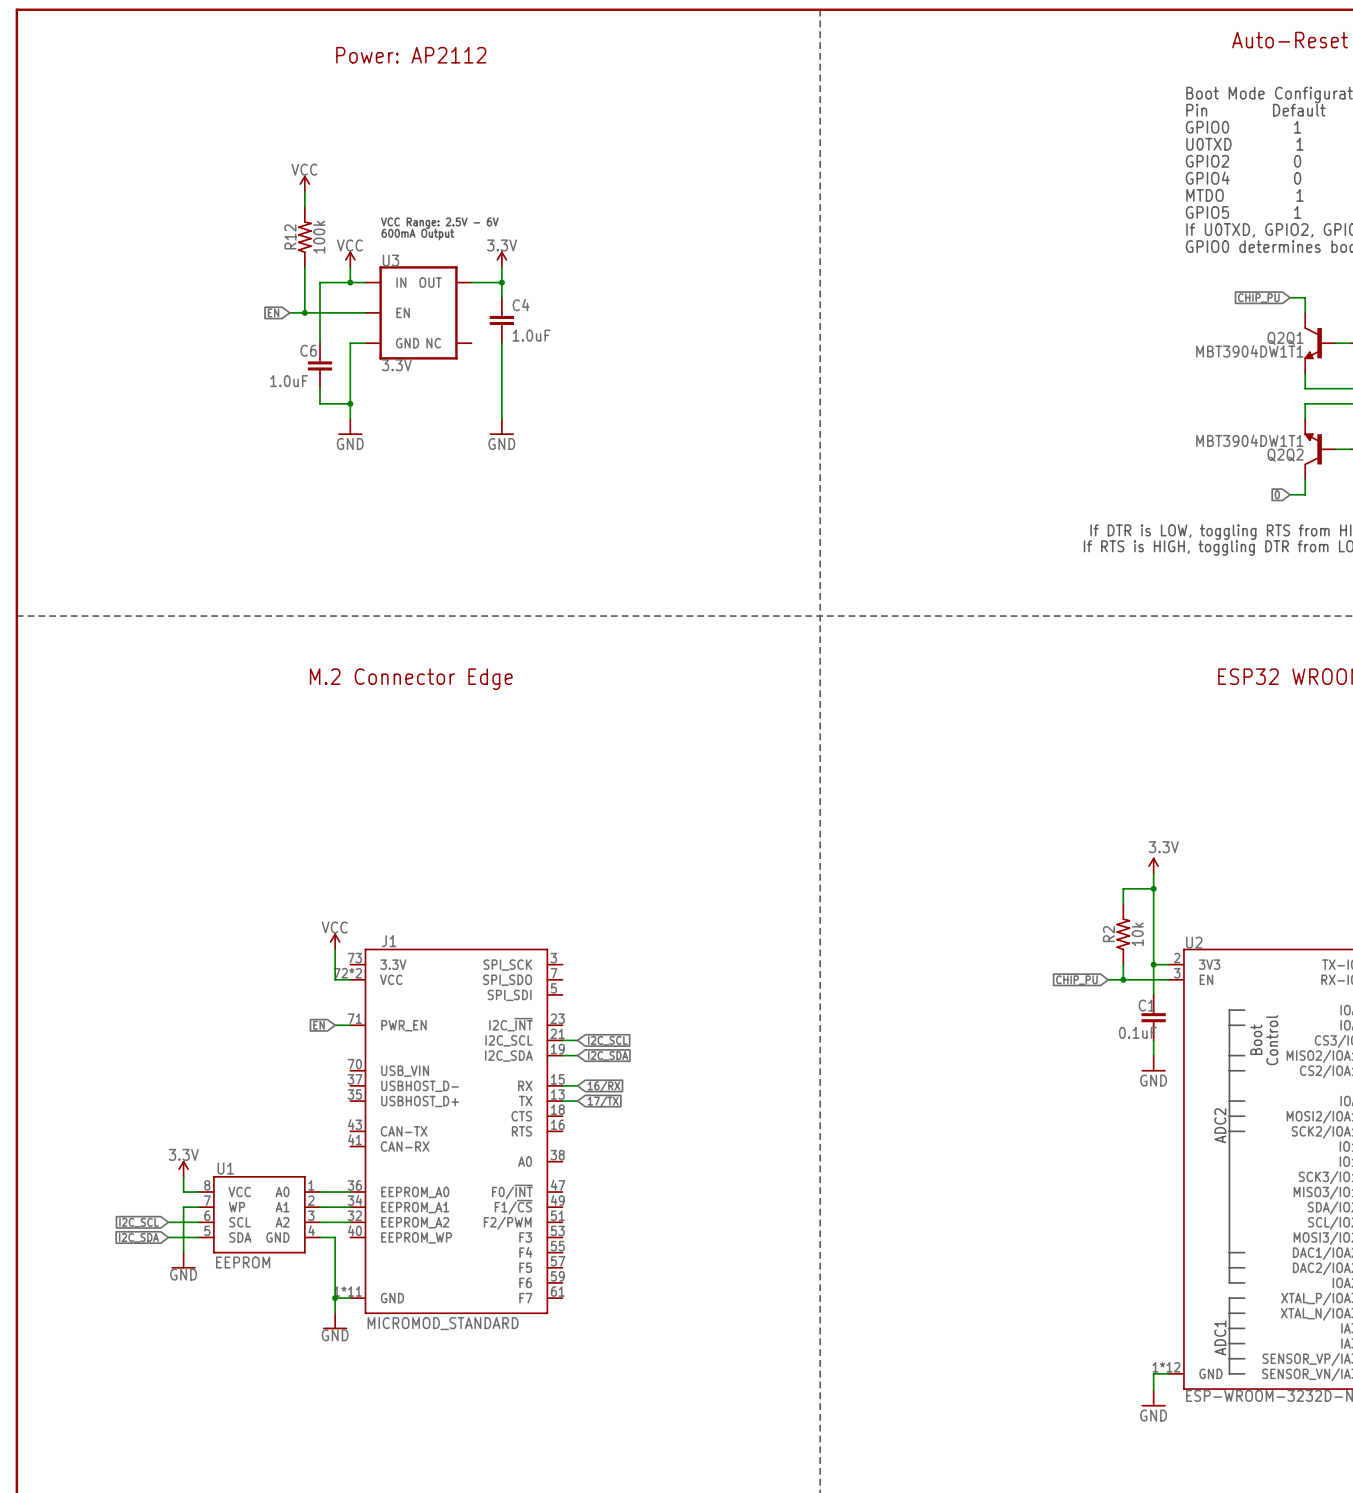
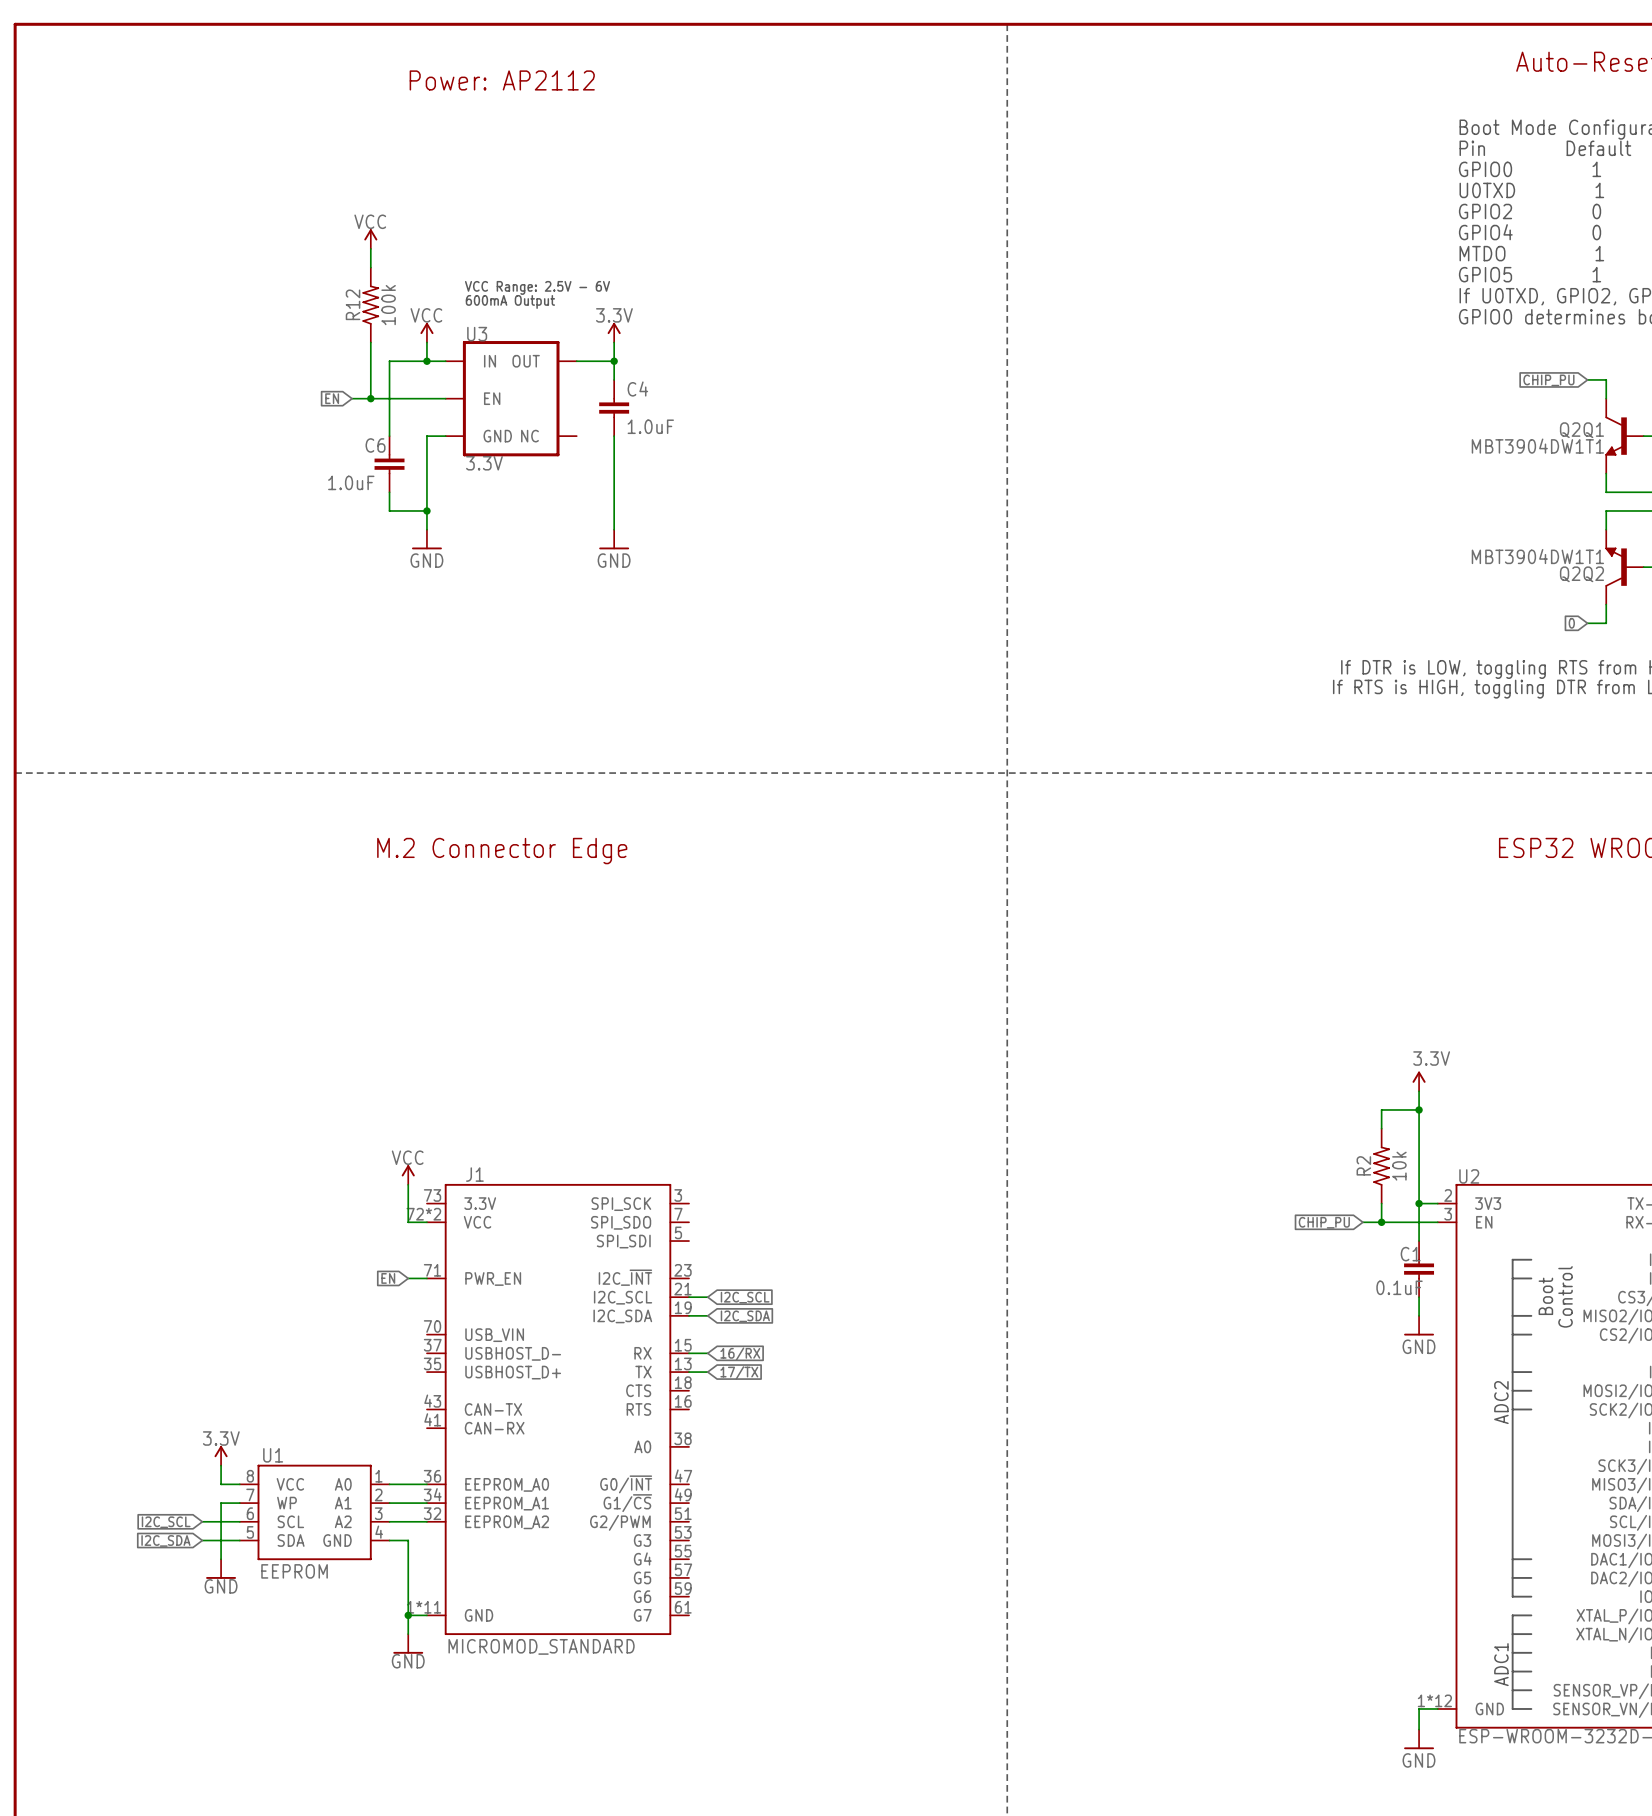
J1 symbol: [350, 948, 563, 1315] -> [426, 1183, 690, 1636]

